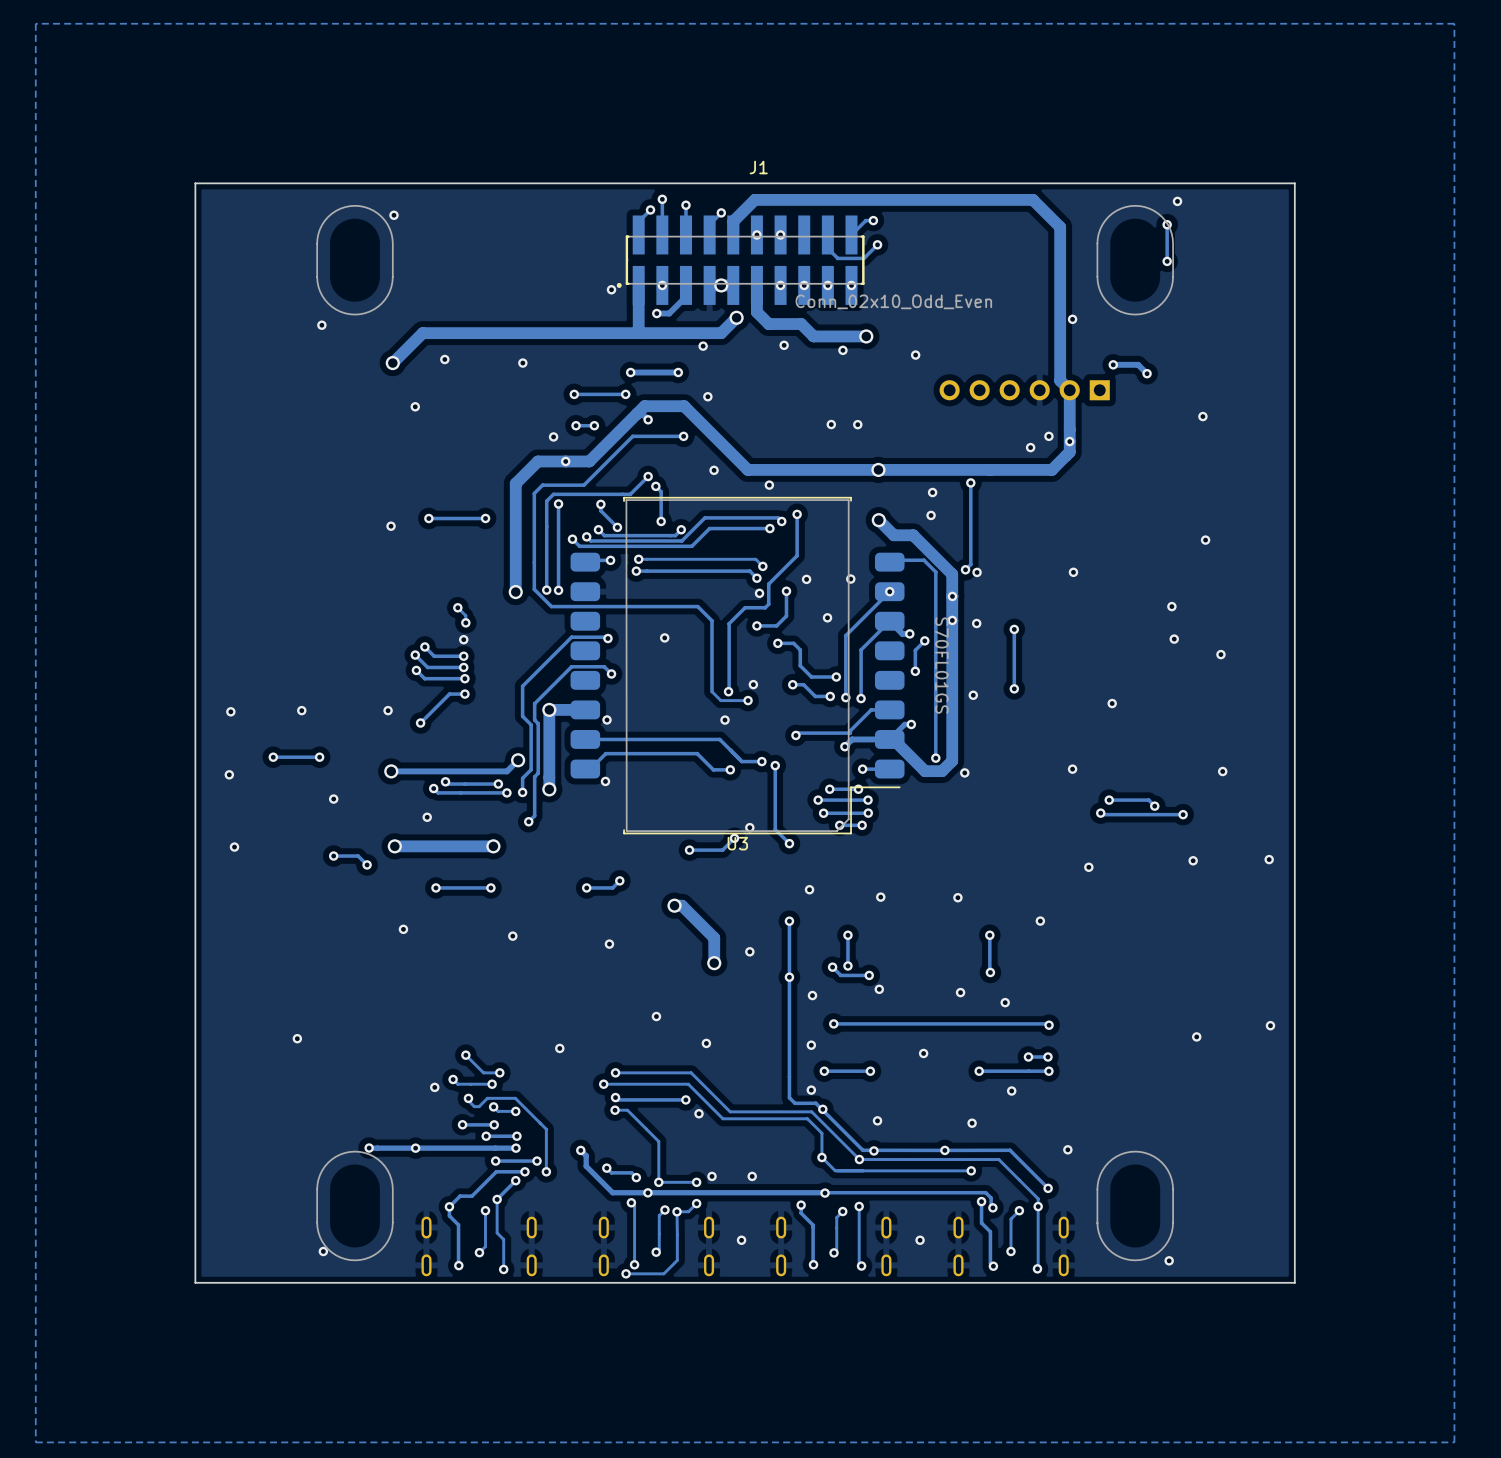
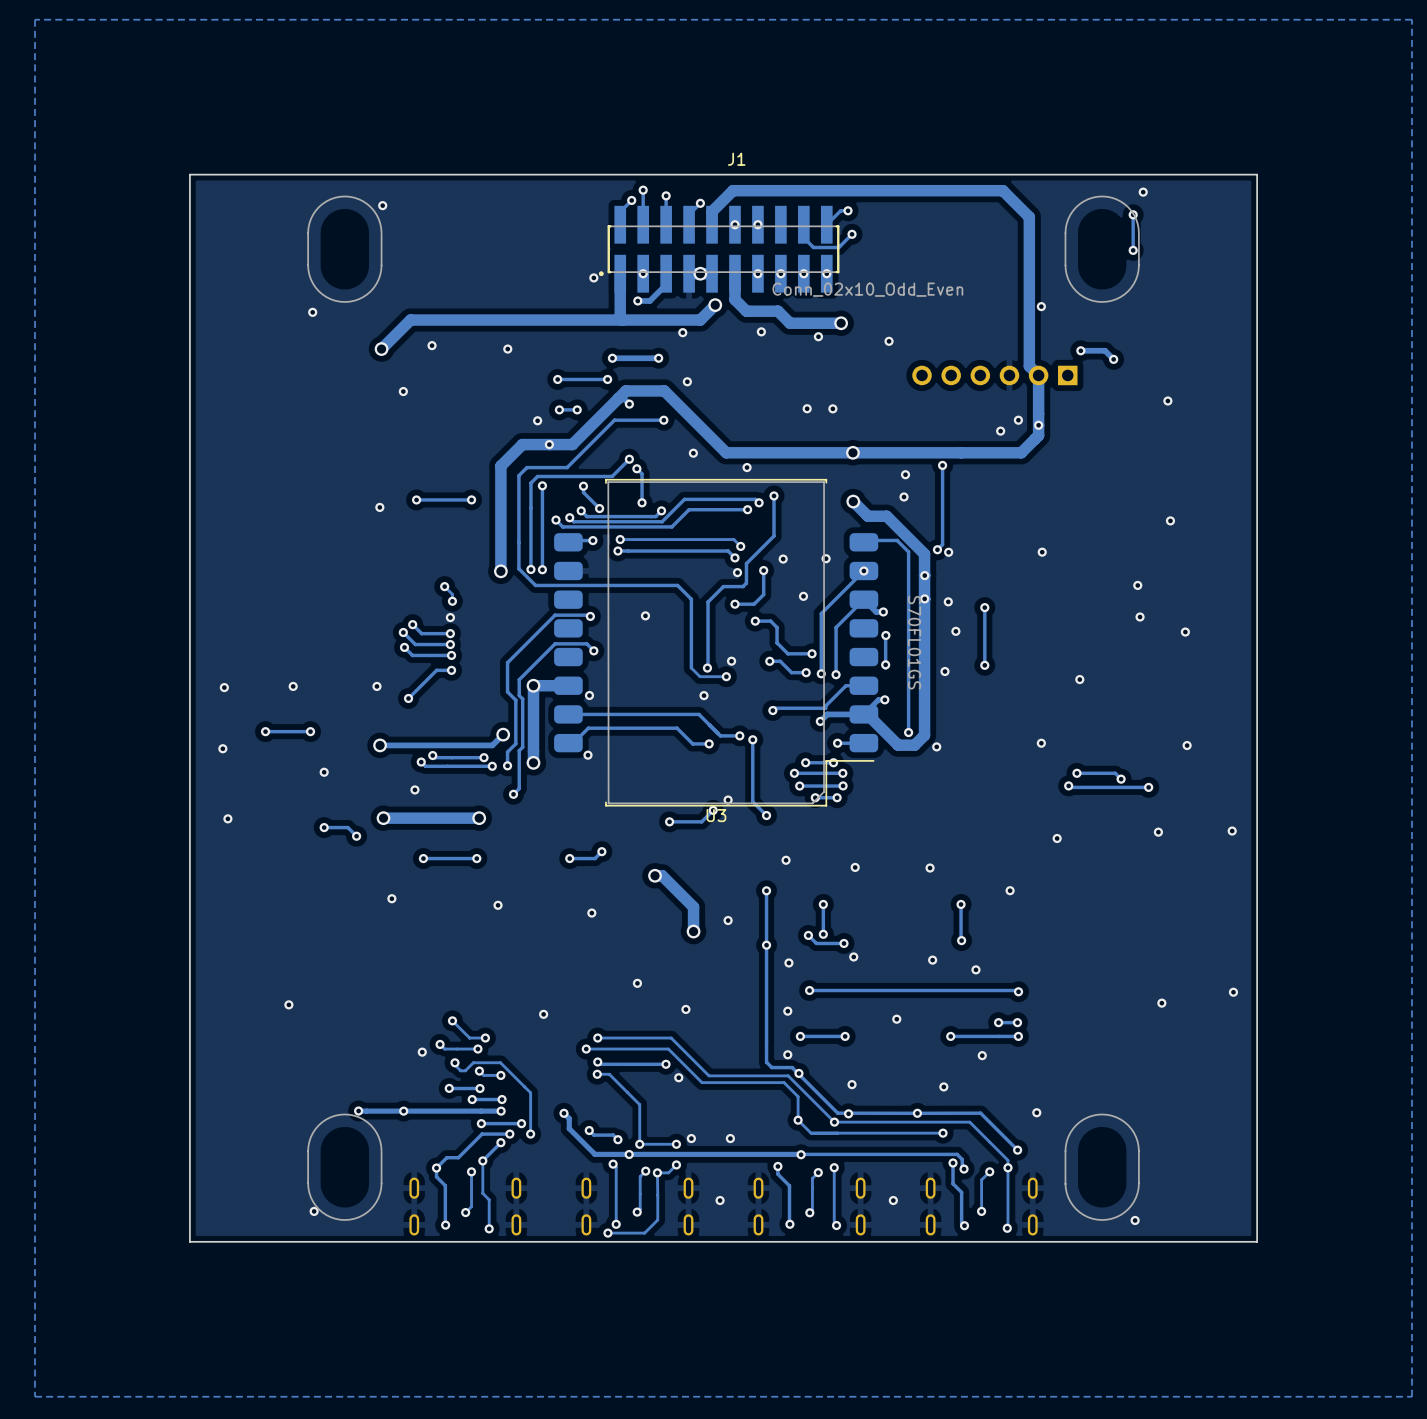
track: (924, 640) (915, 650) (915, 671) -> none
via: (924, 640) -> none
via: none -> (955, 631)
track: none -> (885, 635) (885, 668)
via: none -> (885, 635)
via: (915, 671) -> none
via: none -> (885, 664)

